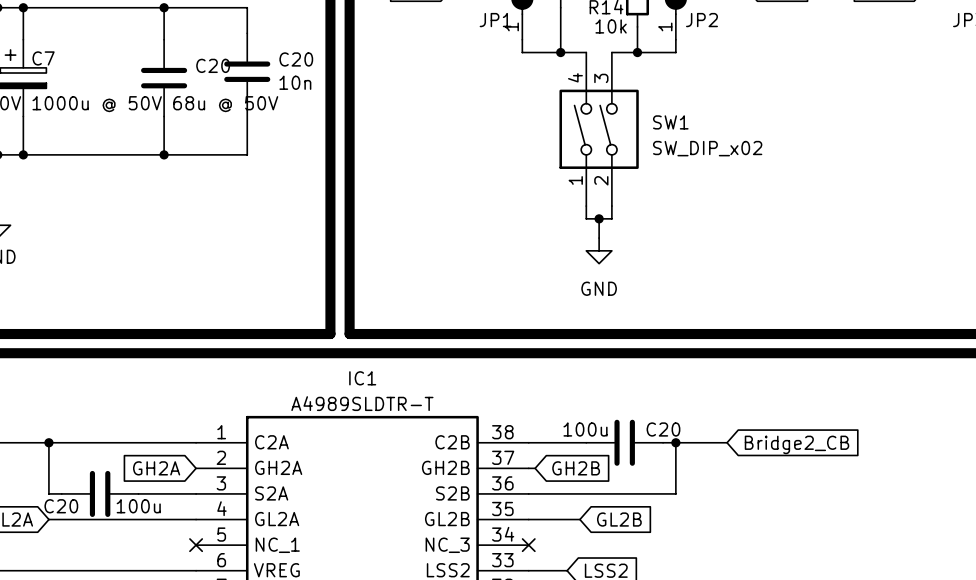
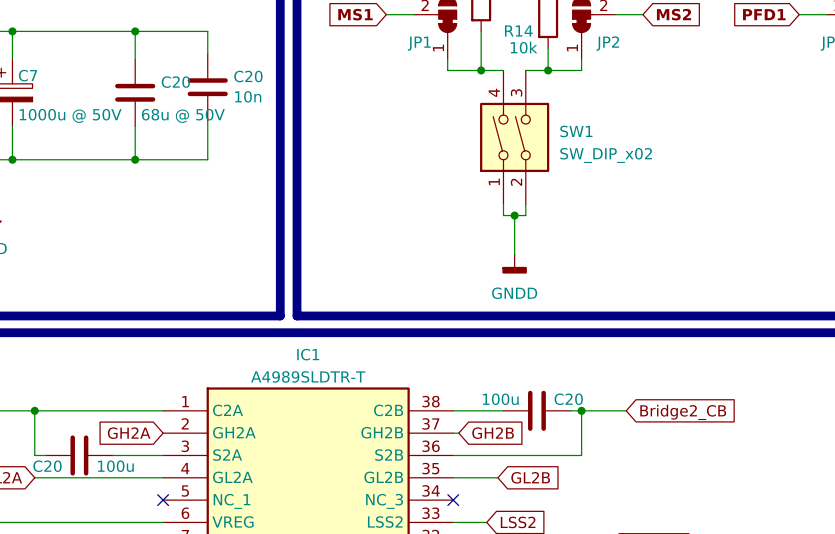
power symbol: GND (599, 250) -> none
power symbol: none -> GNDD (514, 264)

